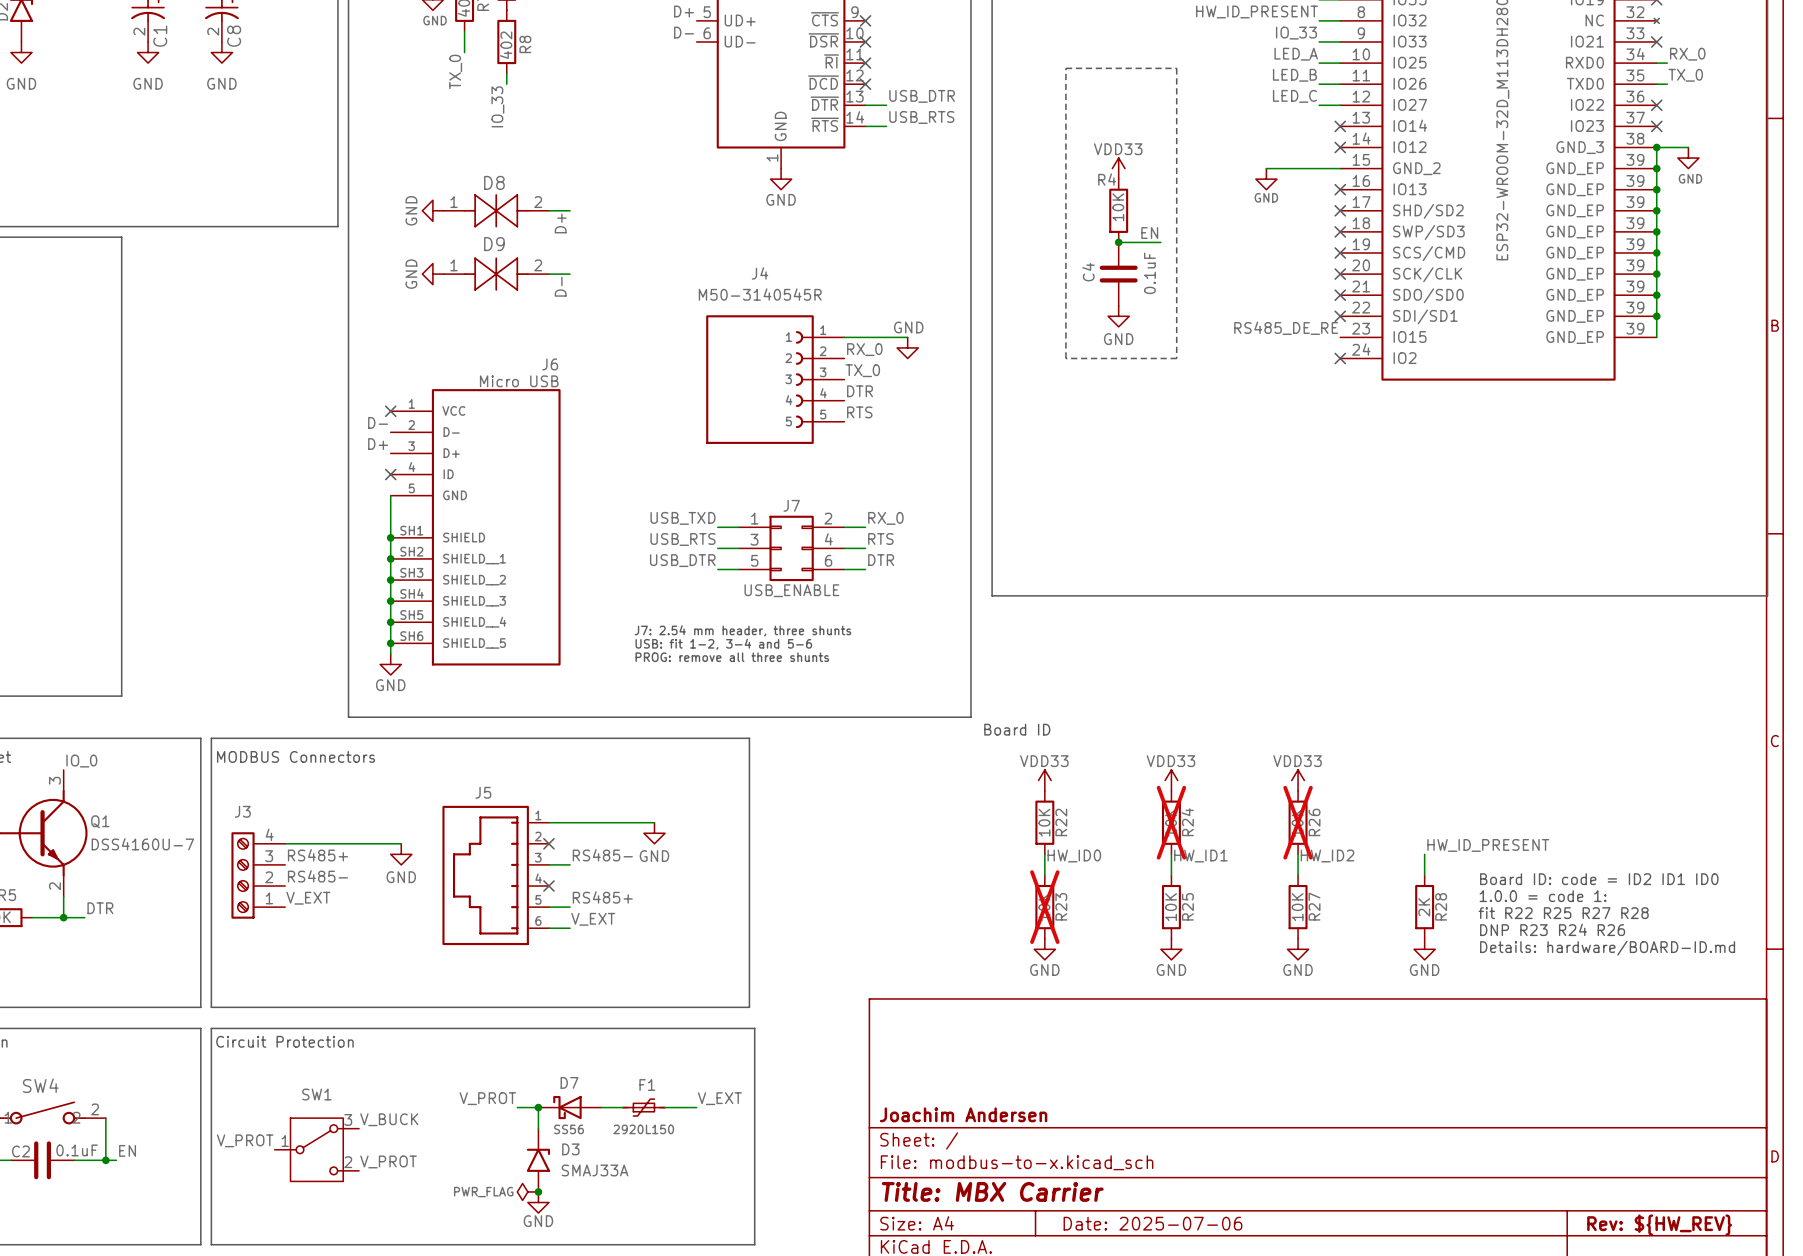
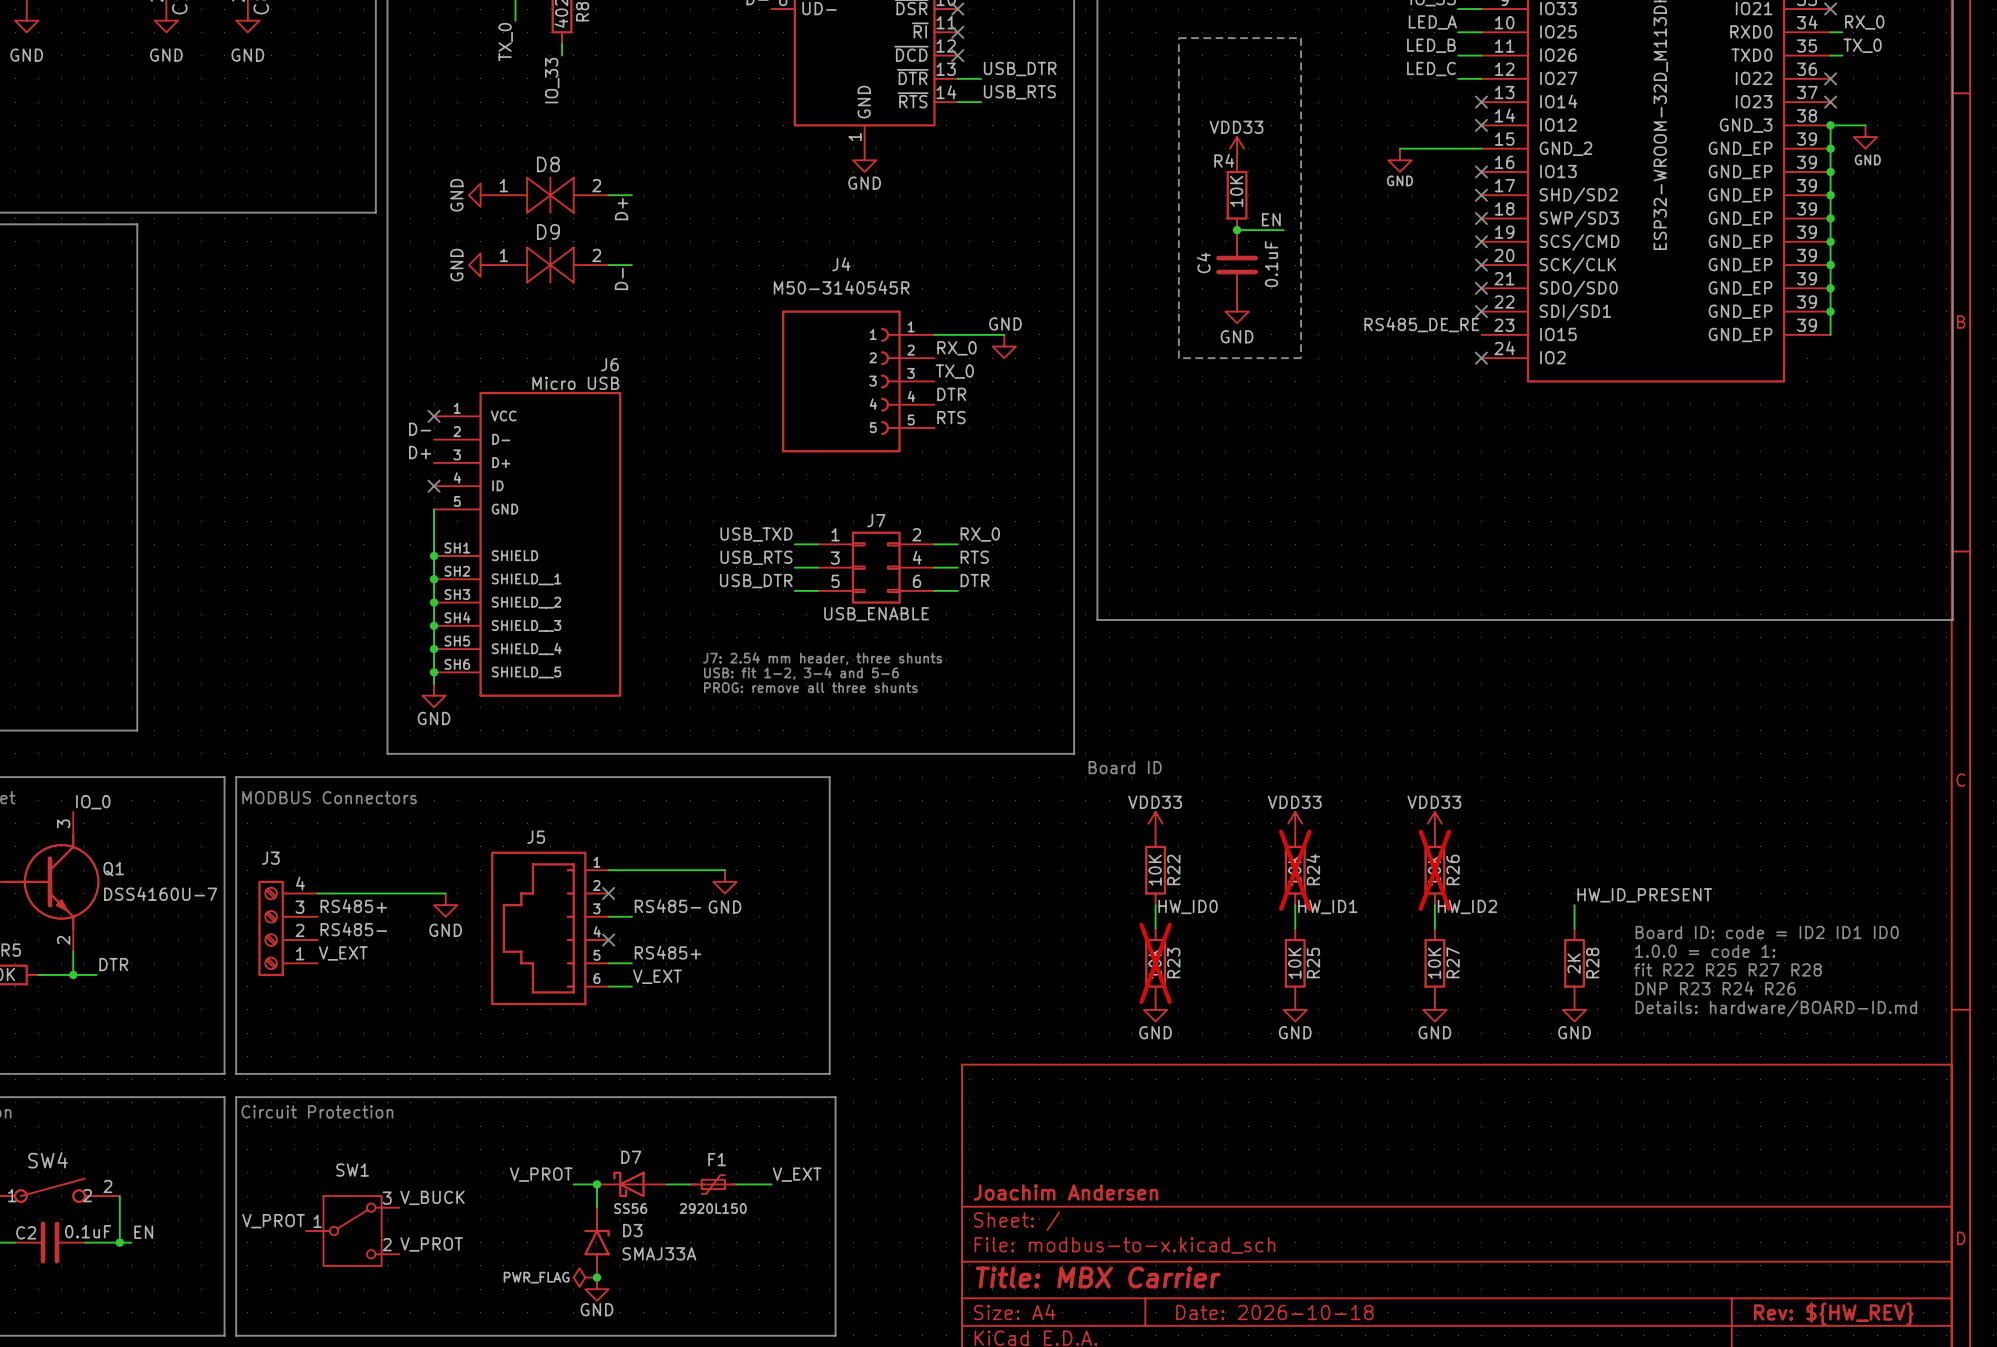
title block: Date: 2025-07-06 (1152, 1223) -> Date: 2026-10-18 (1274, 1312)

